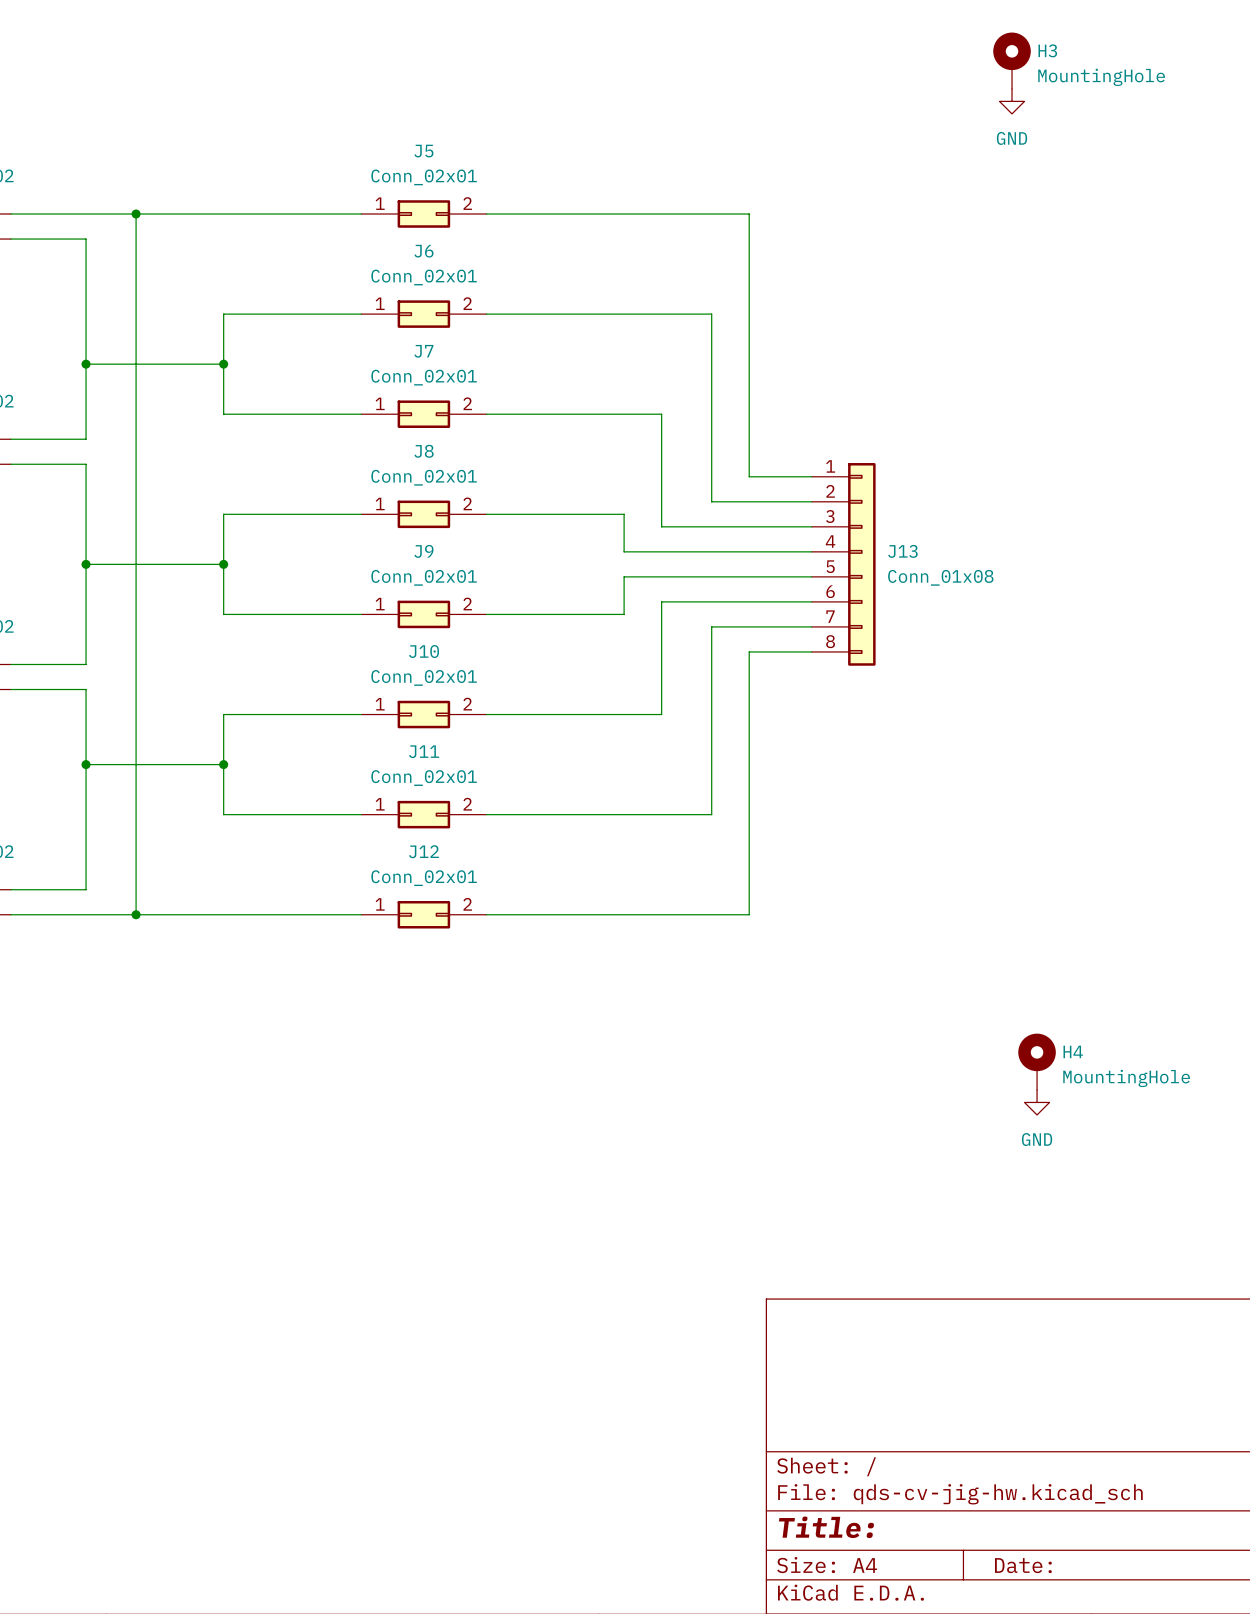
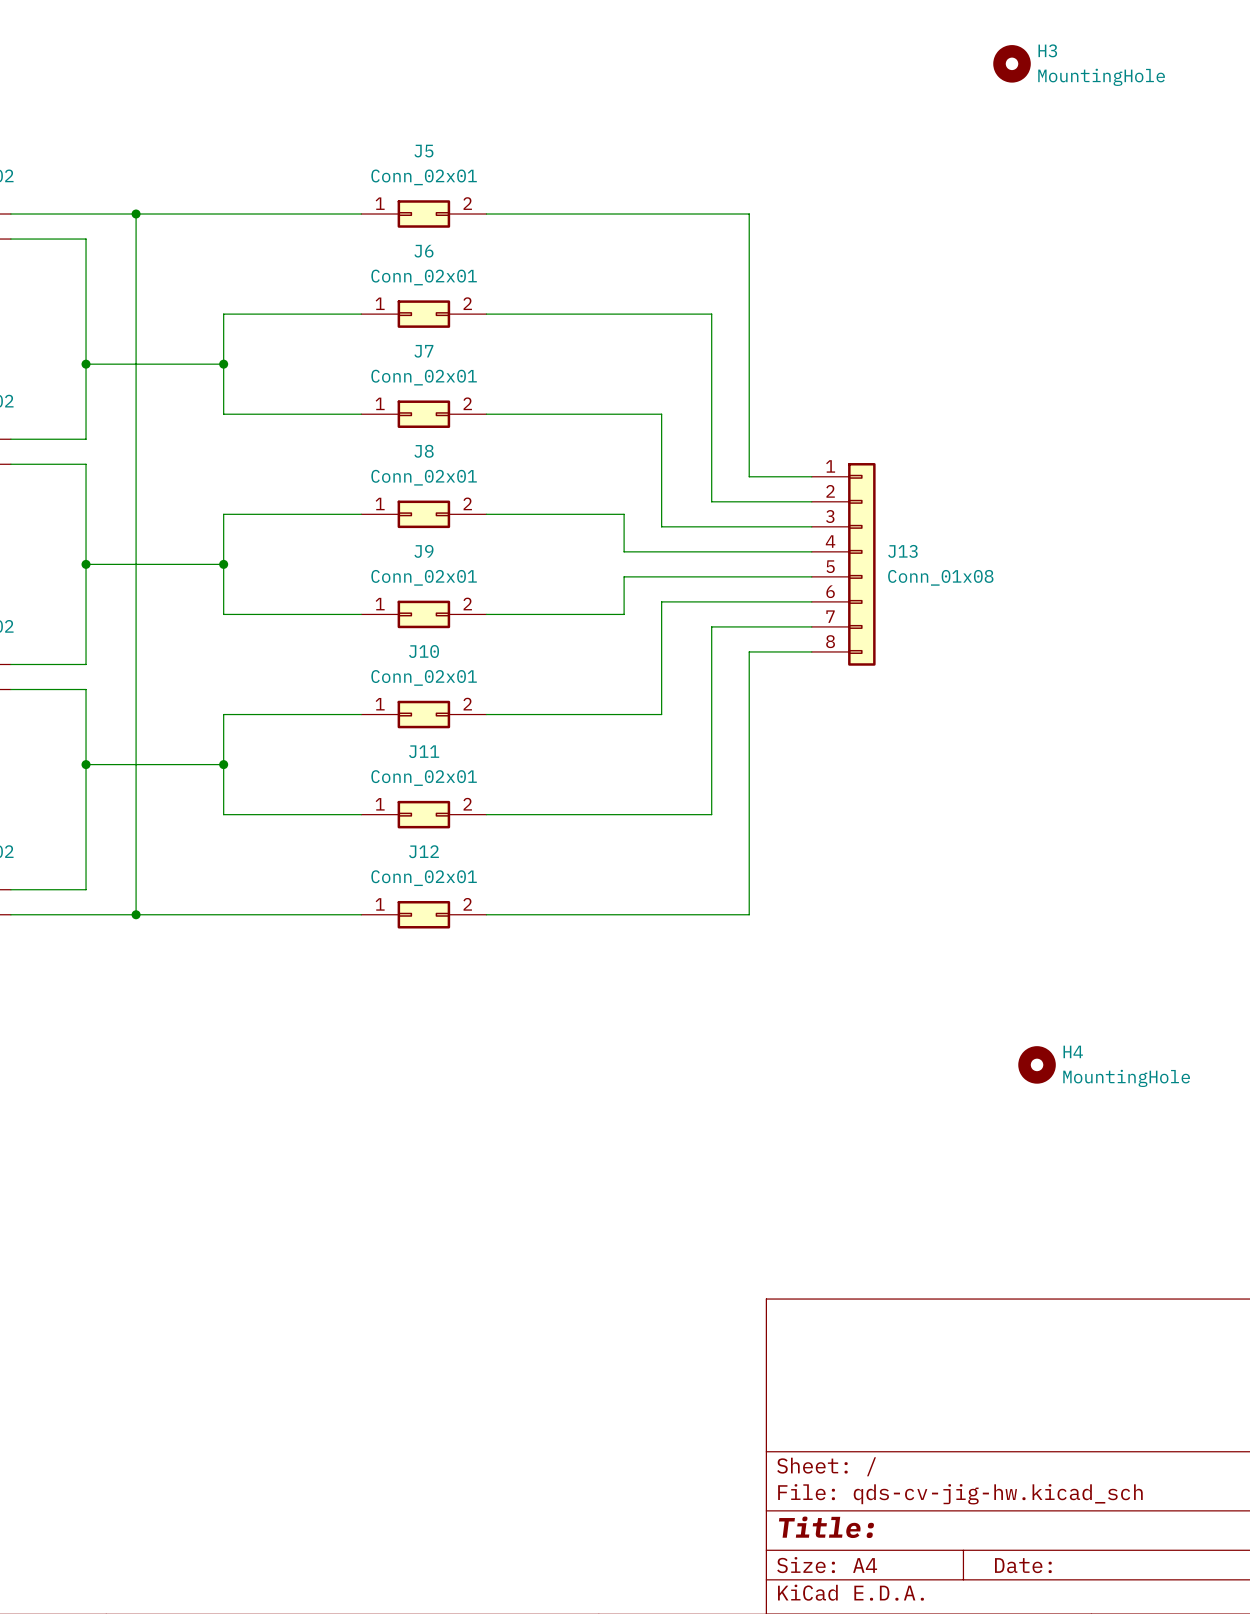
H3 symbol: [993, 32, 1031, 89] -> [993, 45, 1031, 83]
power symbol: GND (1012, 101) -> none
H4 symbol: [1018, 1033, 1056, 1090] -> [1018, 1046, 1056, 1084]
power symbol: GND (1037, 1102) -> none

